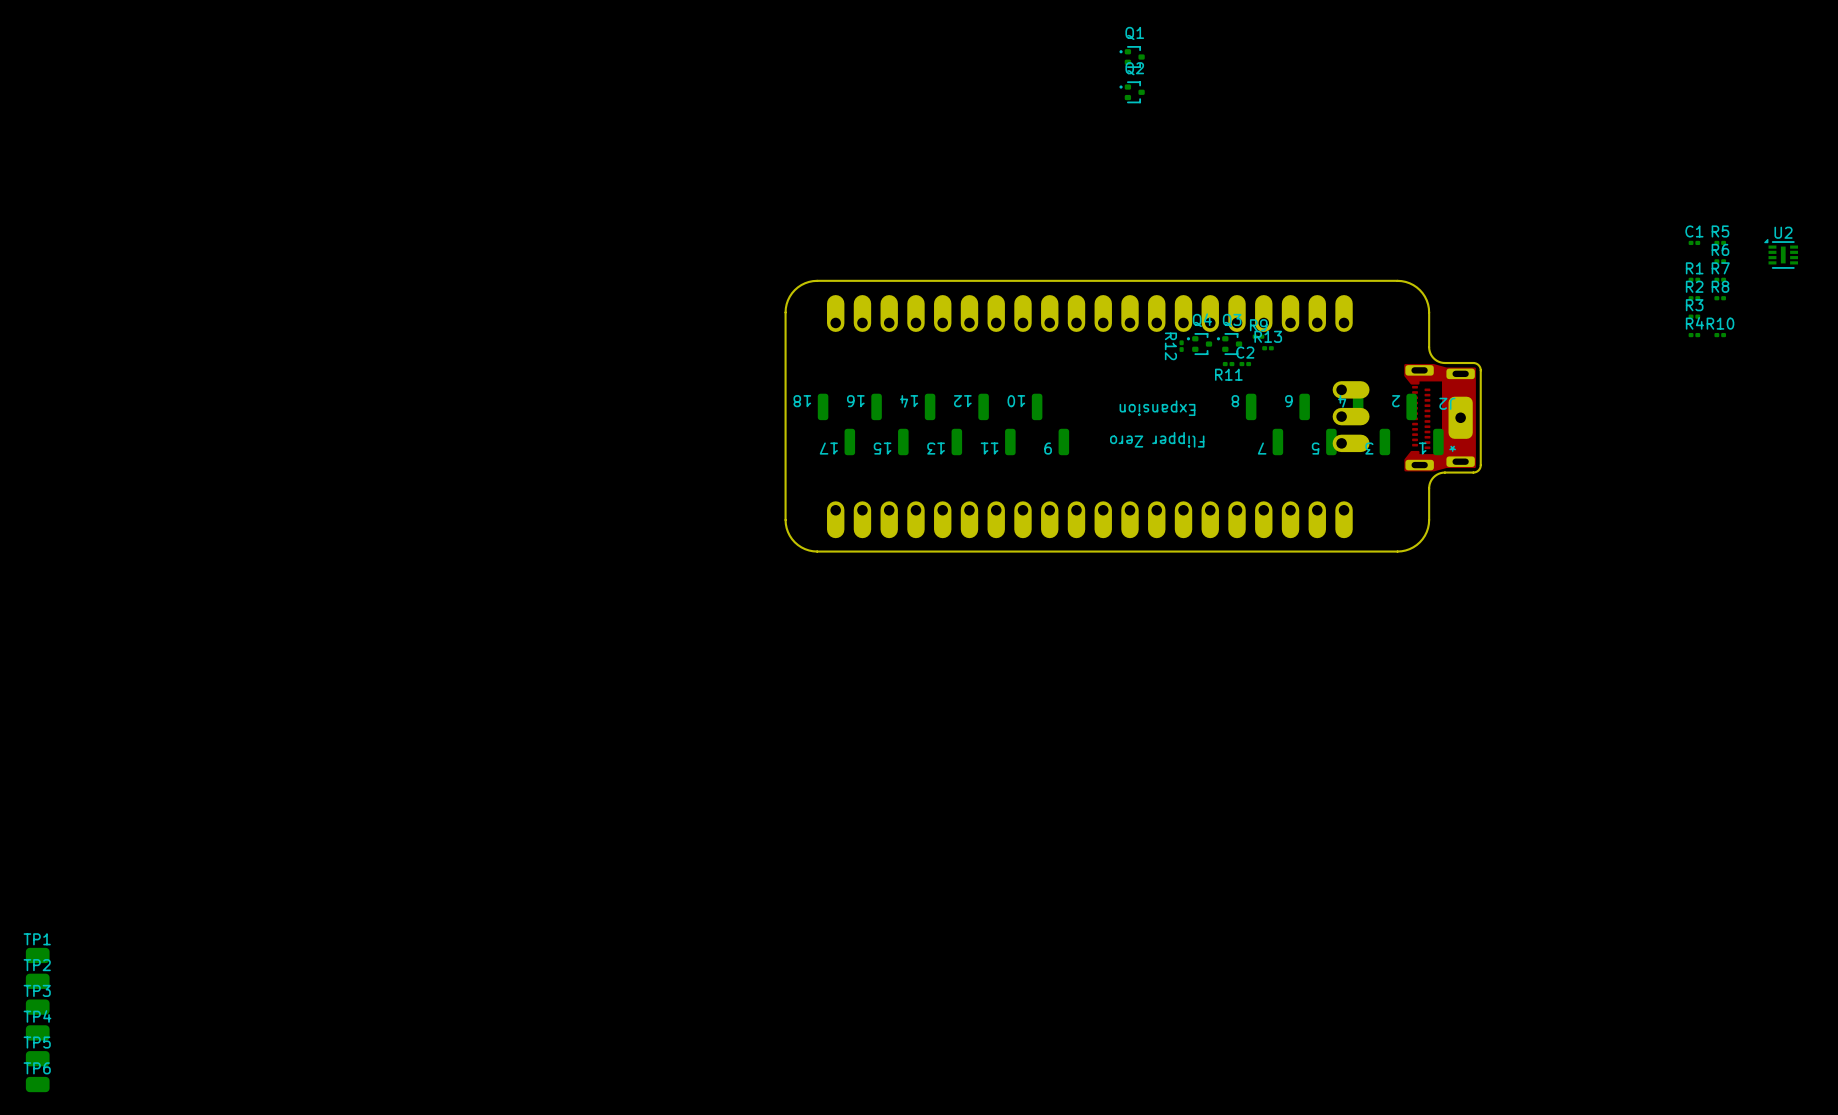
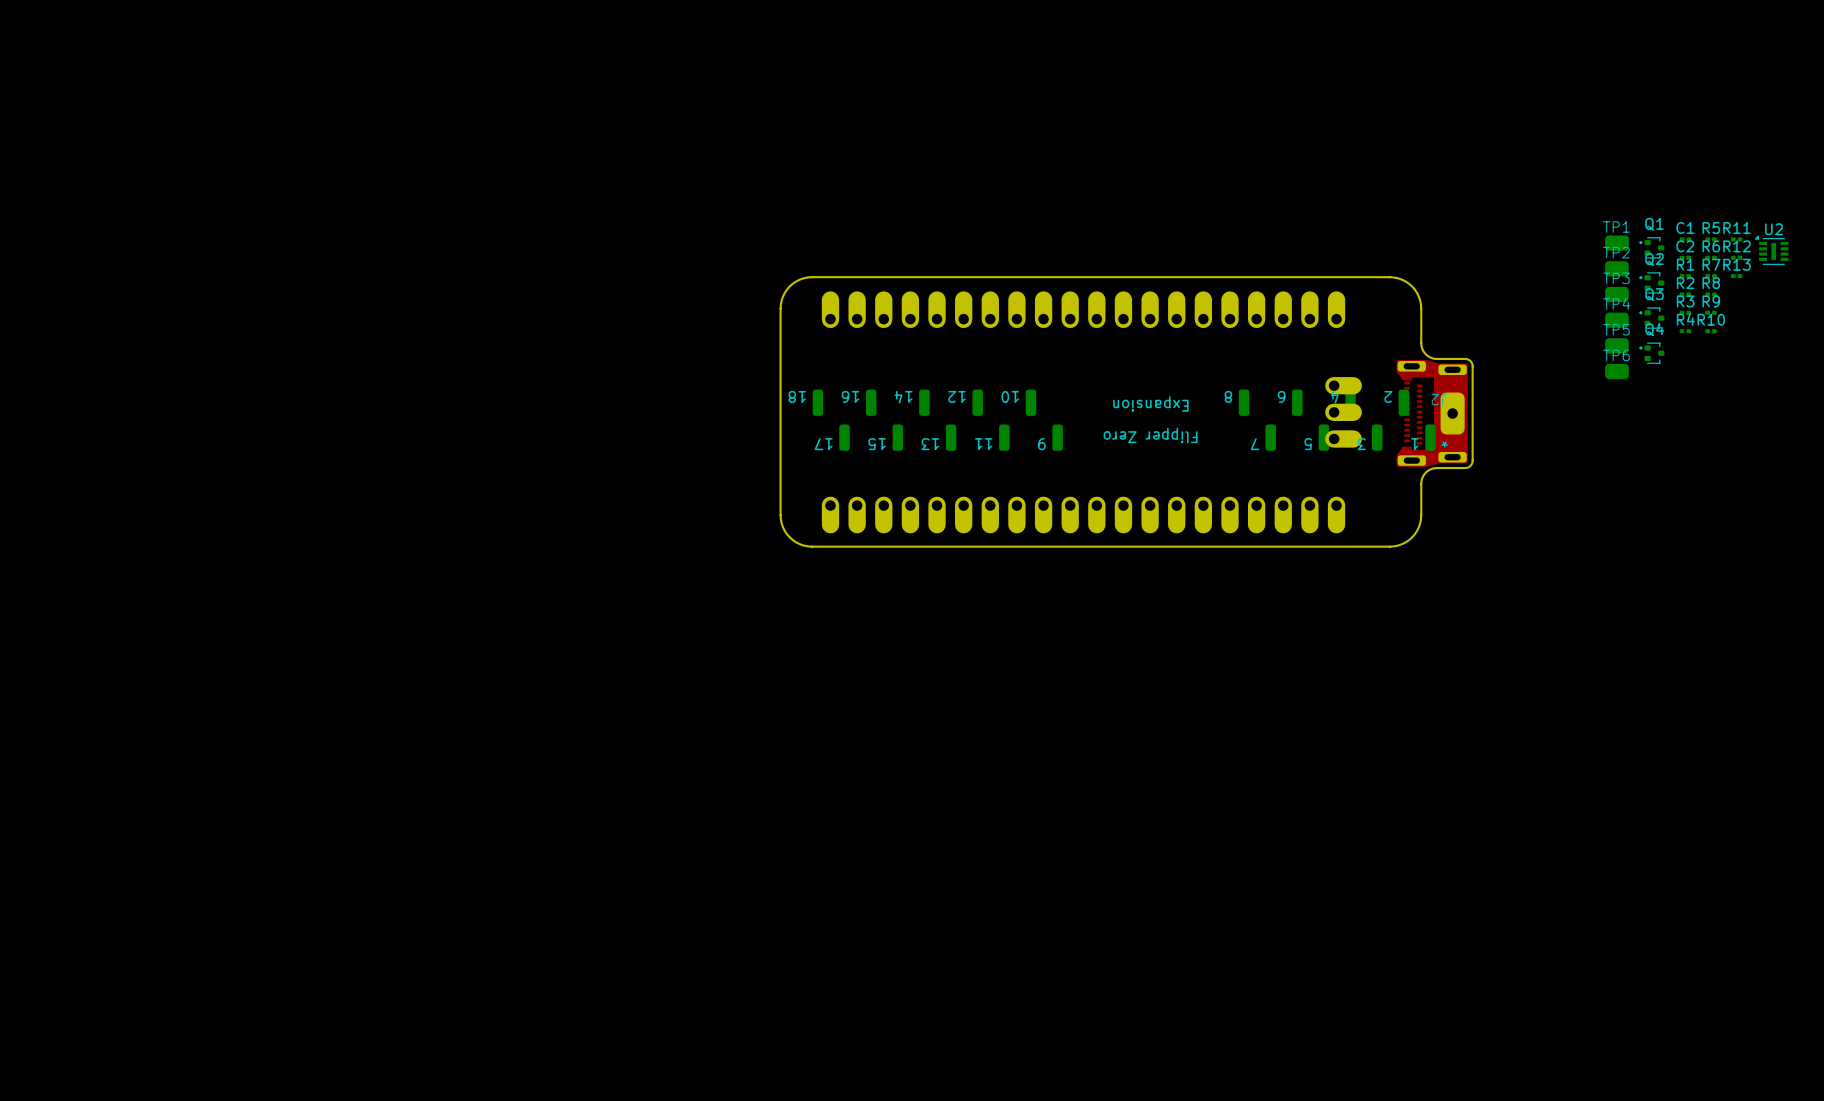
Q1 position: (1132, 57) -> (1651, 247)
Q2 position: (1132, 92) -> (1651, 282)
R9 position: (1258, 336) -> (1711, 312)
Q4 position: (1199, 344) -> (1651, 353)
Q3 position: (1229, 344) -> (1651, 318)
R12 rotation: 0° (1181, 346) -> 90° clockwise (1736, 257)
R12 position: (1181, 346) -> (1736, 257)
R13 position: (1267, 348) -> (1736, 276)
R11 position: (1228, 364) -> (1736, 239)
C2 position: (1245, 364) -> (1685, 257)
R11 name position: R11 (1228, 374) -> R11 (1736, 228)
TP1 position: (37, 955) -> (1616, 243)
TP2 position: (37, 981) -> (1616, 268)
TP3 position: (37, 1007) -> (1616, 294)
TP4 position: (37, 1032) -> (1616, 320)
TP5 position: (37, 1058) -> (1616, 345)
TP6 position: (37, 1084) -> (1616, 371)

